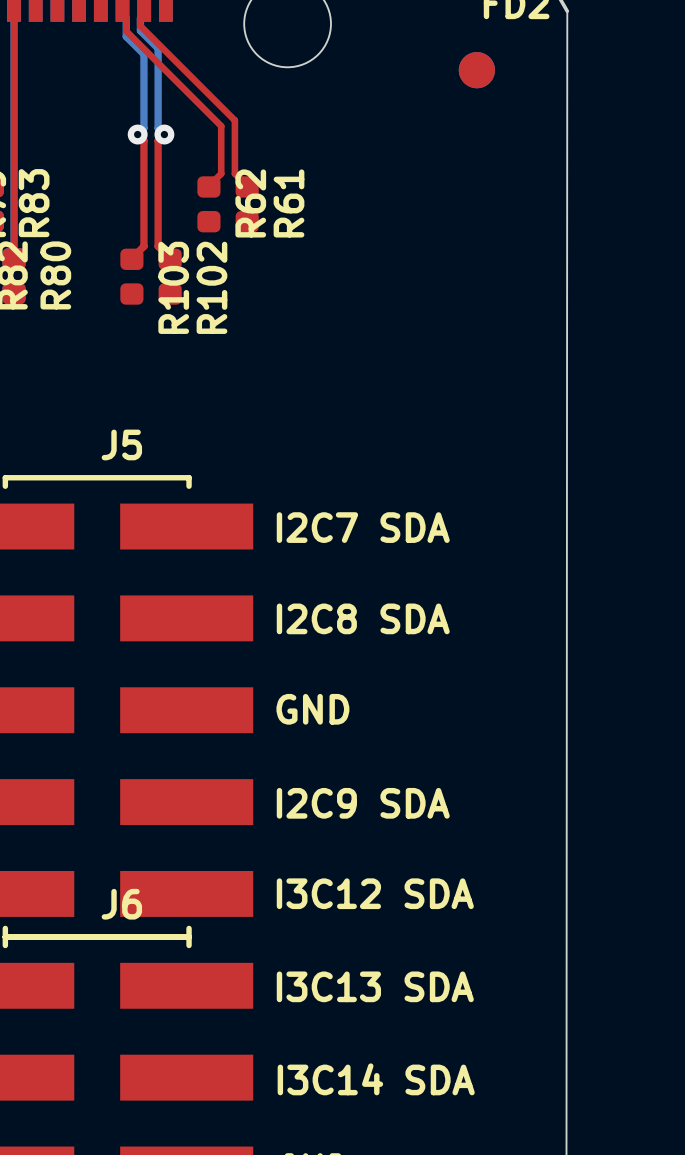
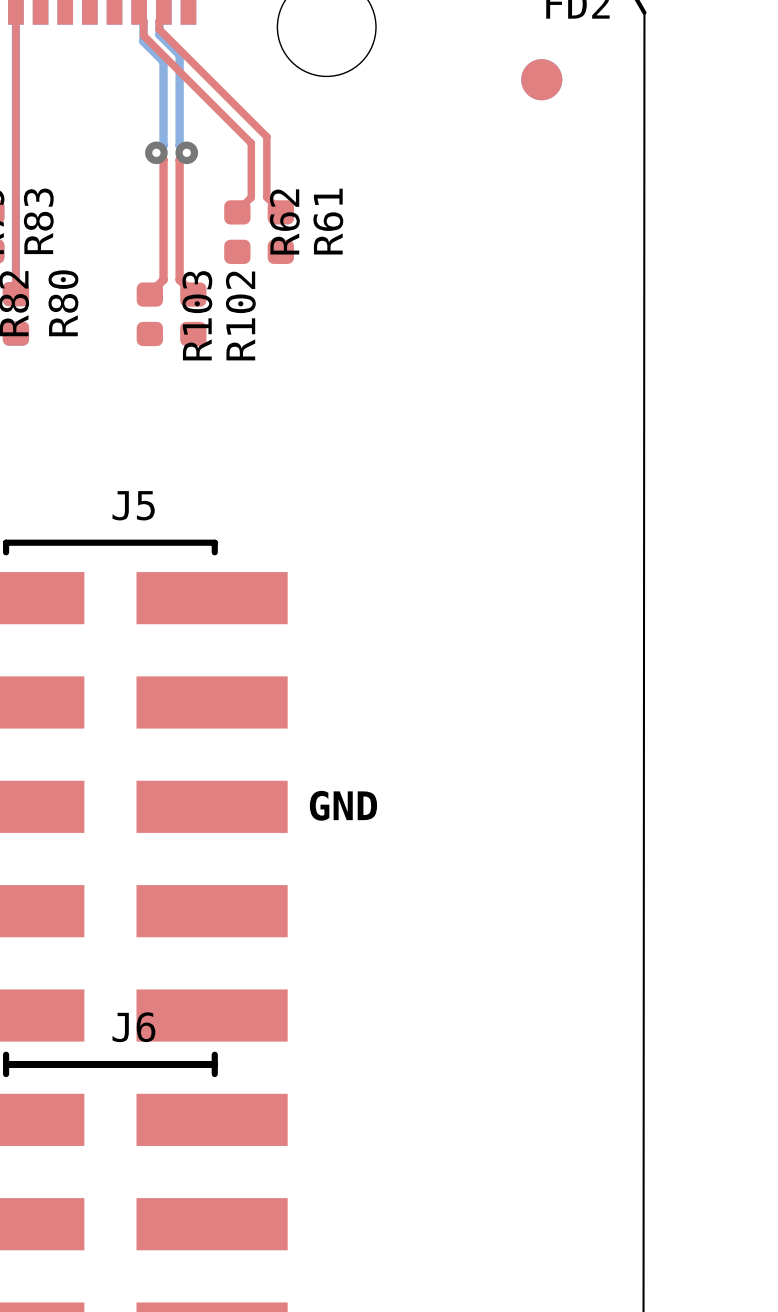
text: I2C7 SDA (363, 527) -> none
text: I2C8 SDA (363, 618) -> none
text: I2C9 SDA (363, 803) -> none
text: I3C12 SDA (375, 893) -> none
text: I3C13 SDA (375, 986) -> none
text: I3C14 SDA (376, 1079) -> none

